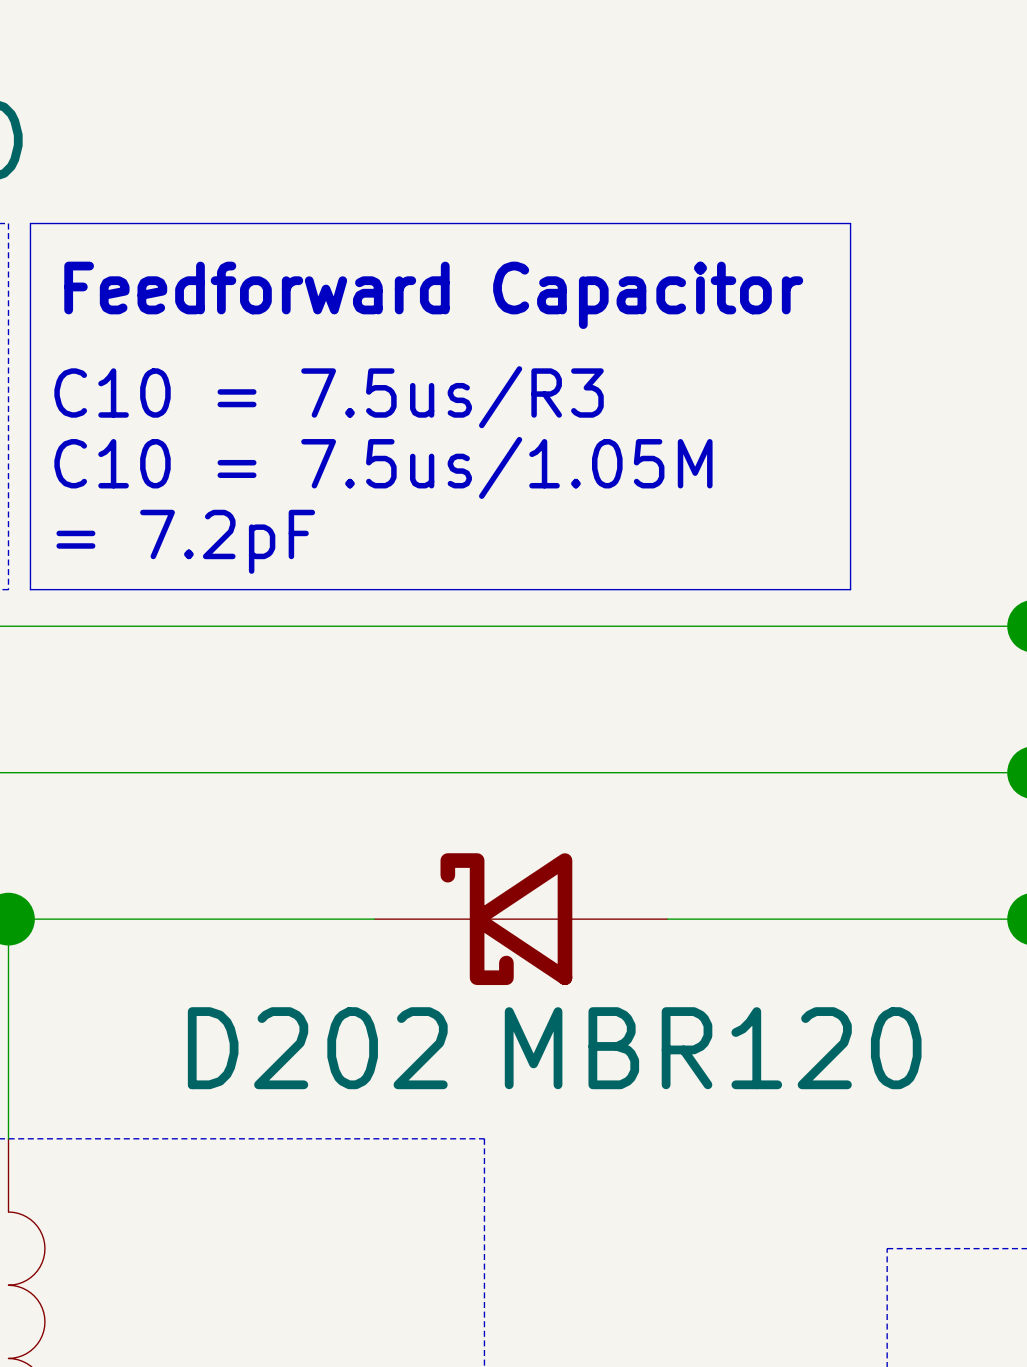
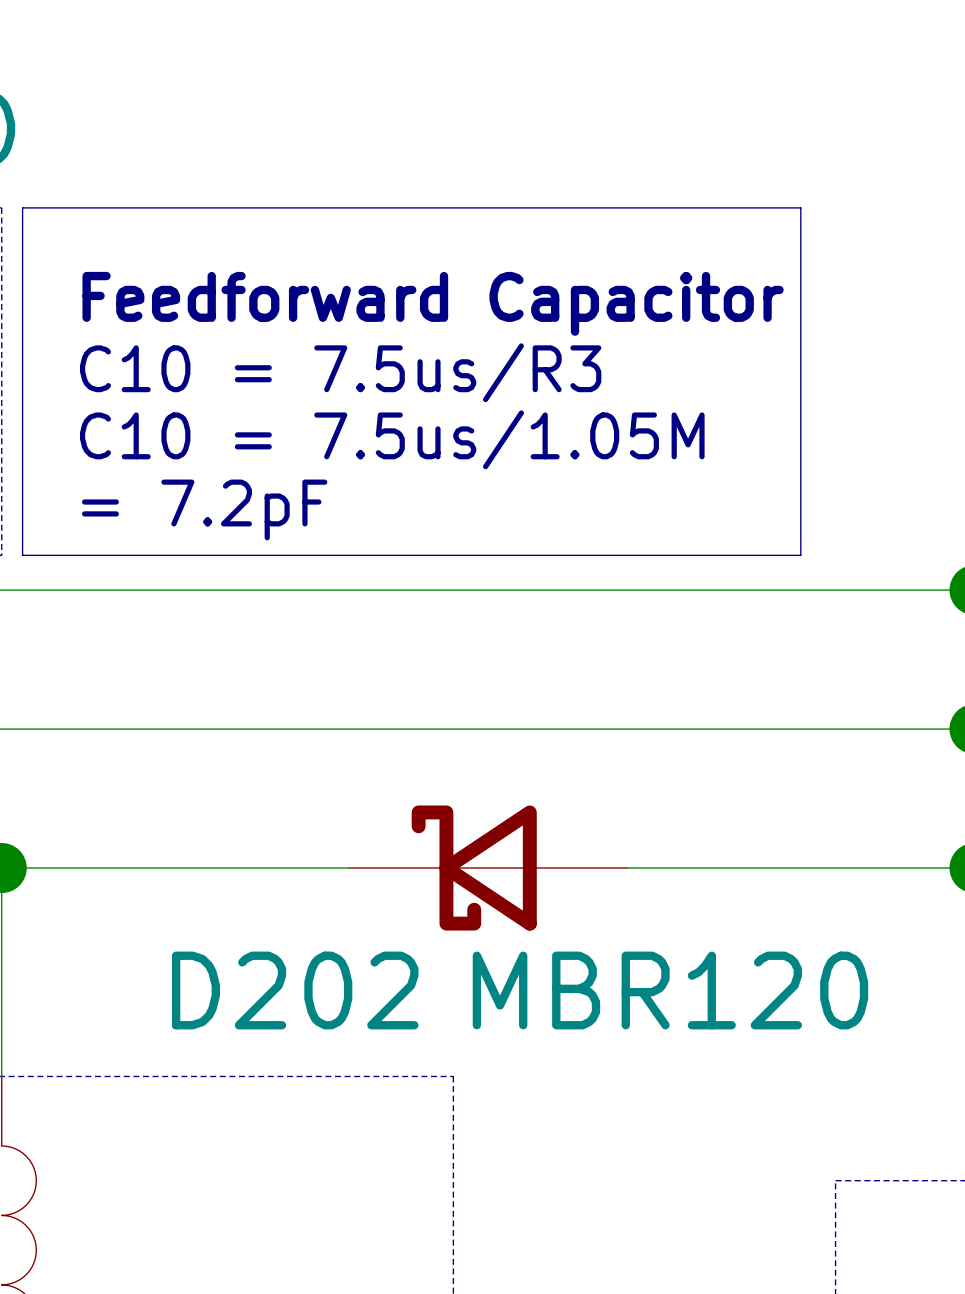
text position: Feedforward Capacitor (433, 295) -> Feedforward Capacitor (433, 303)
text position: C10 = 7.5us/R3 (329, 397) -> C10 = 7.5us/R3 (340, 372)
text position: C10 = 7.5us/1.05M (383, 467) -> C10 = 7.5us/1.05M (392, 439)
text position: = 7.2pF (185, 541) -> = 7.2pF (204, 509)

